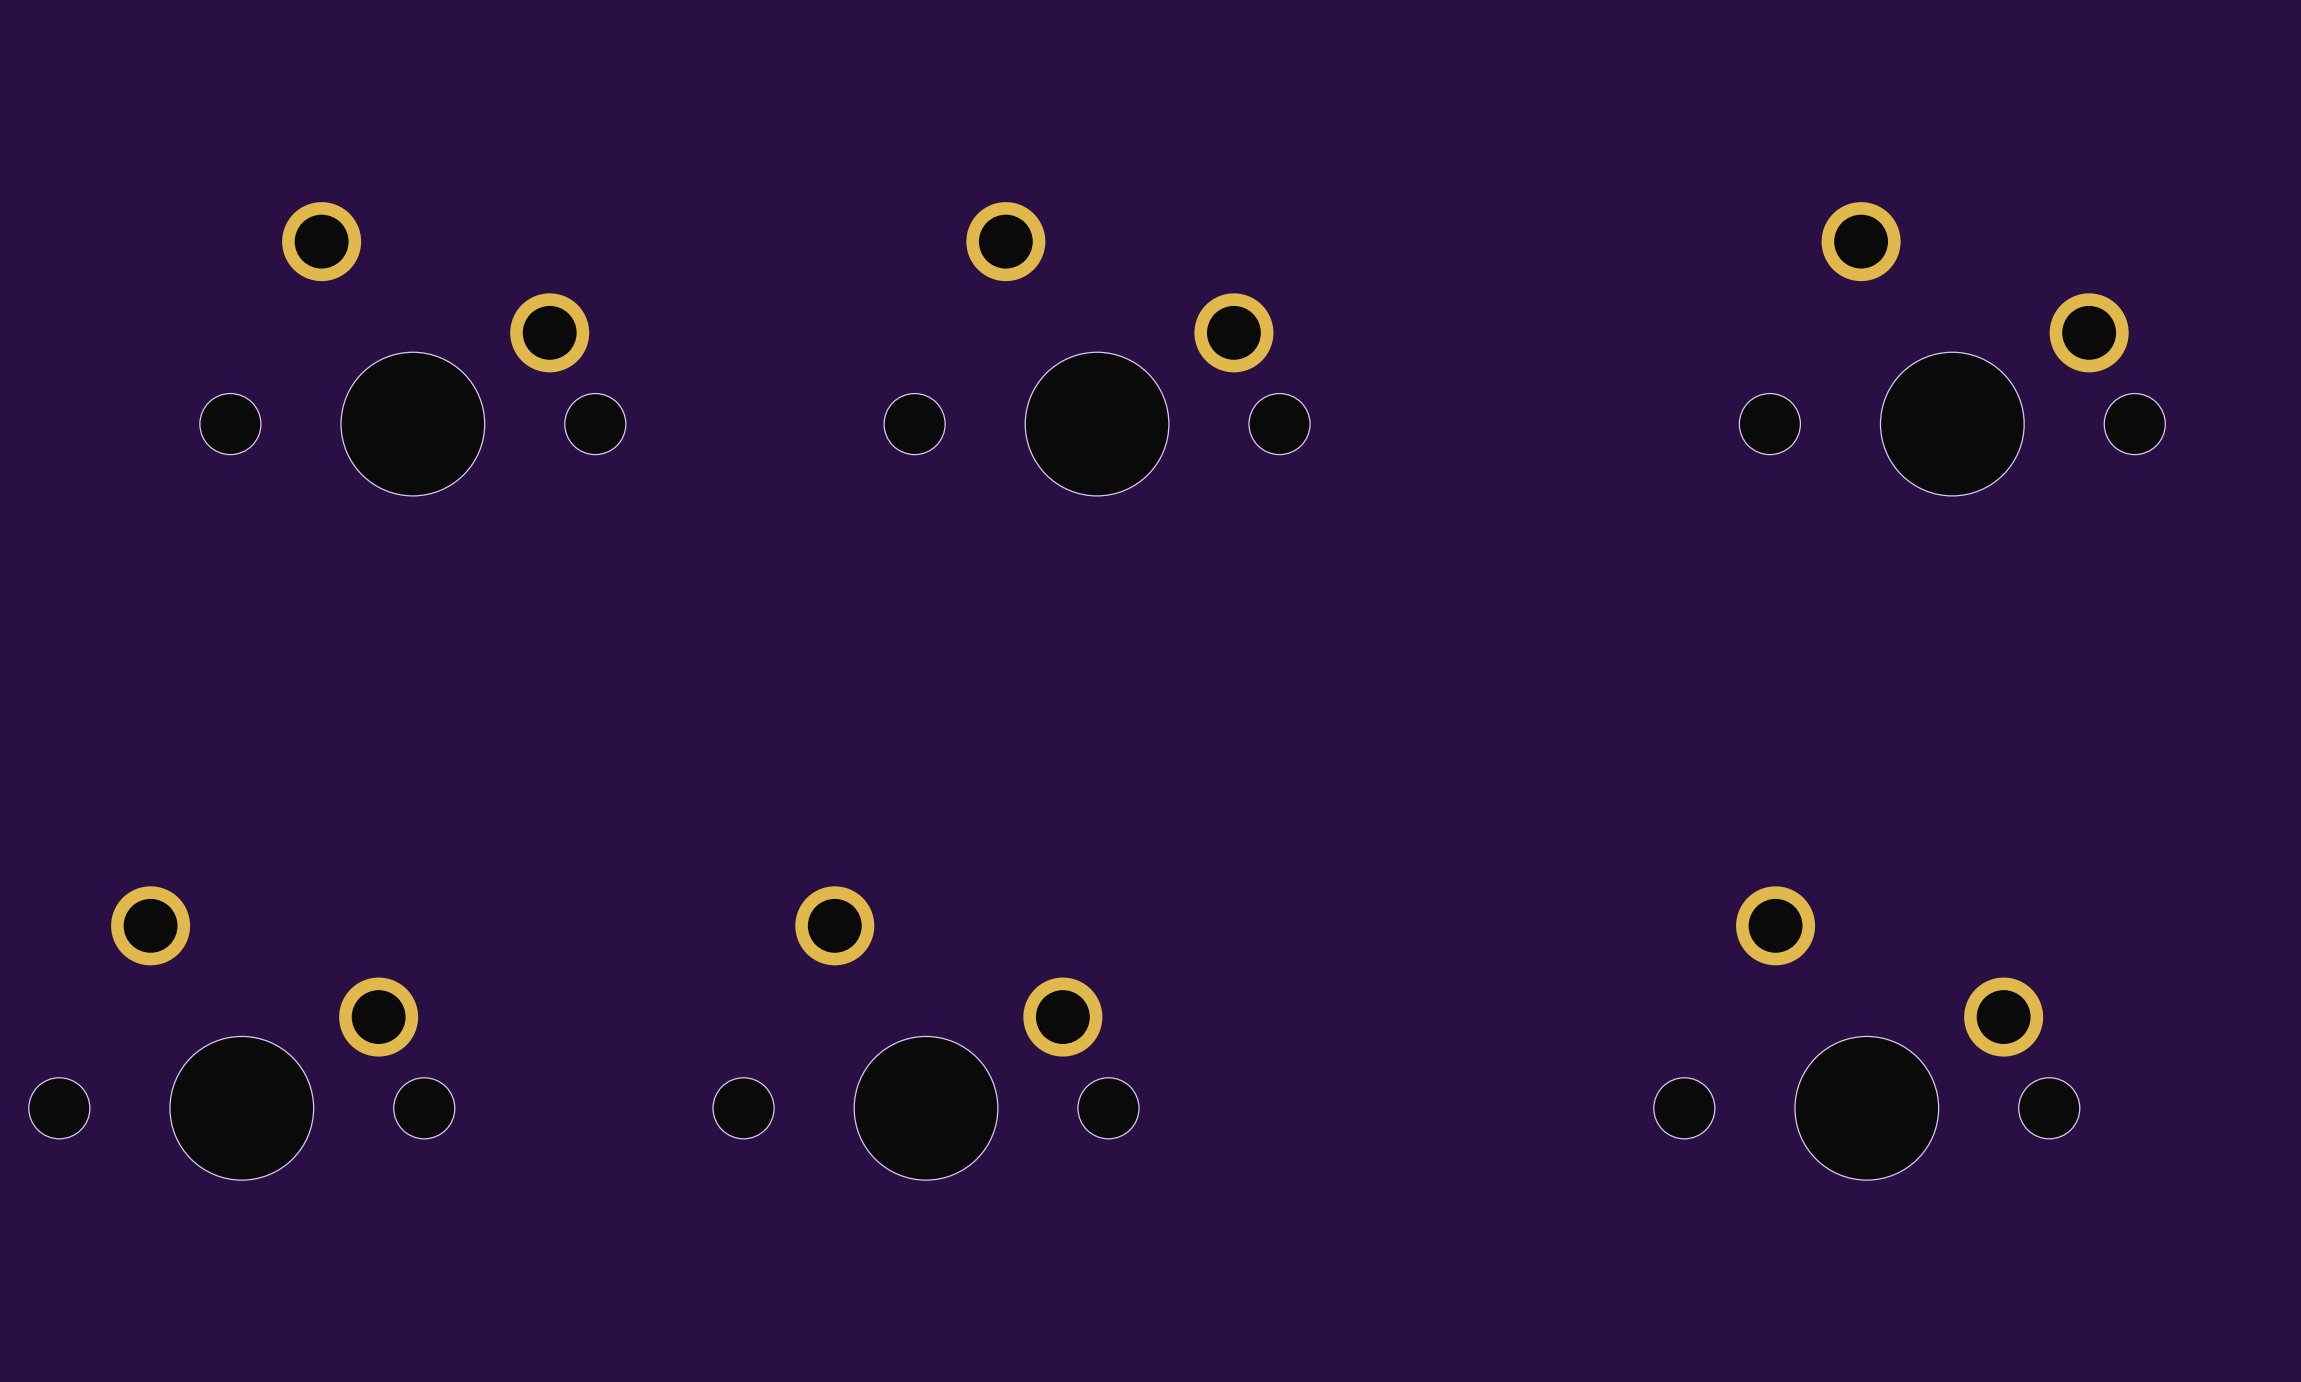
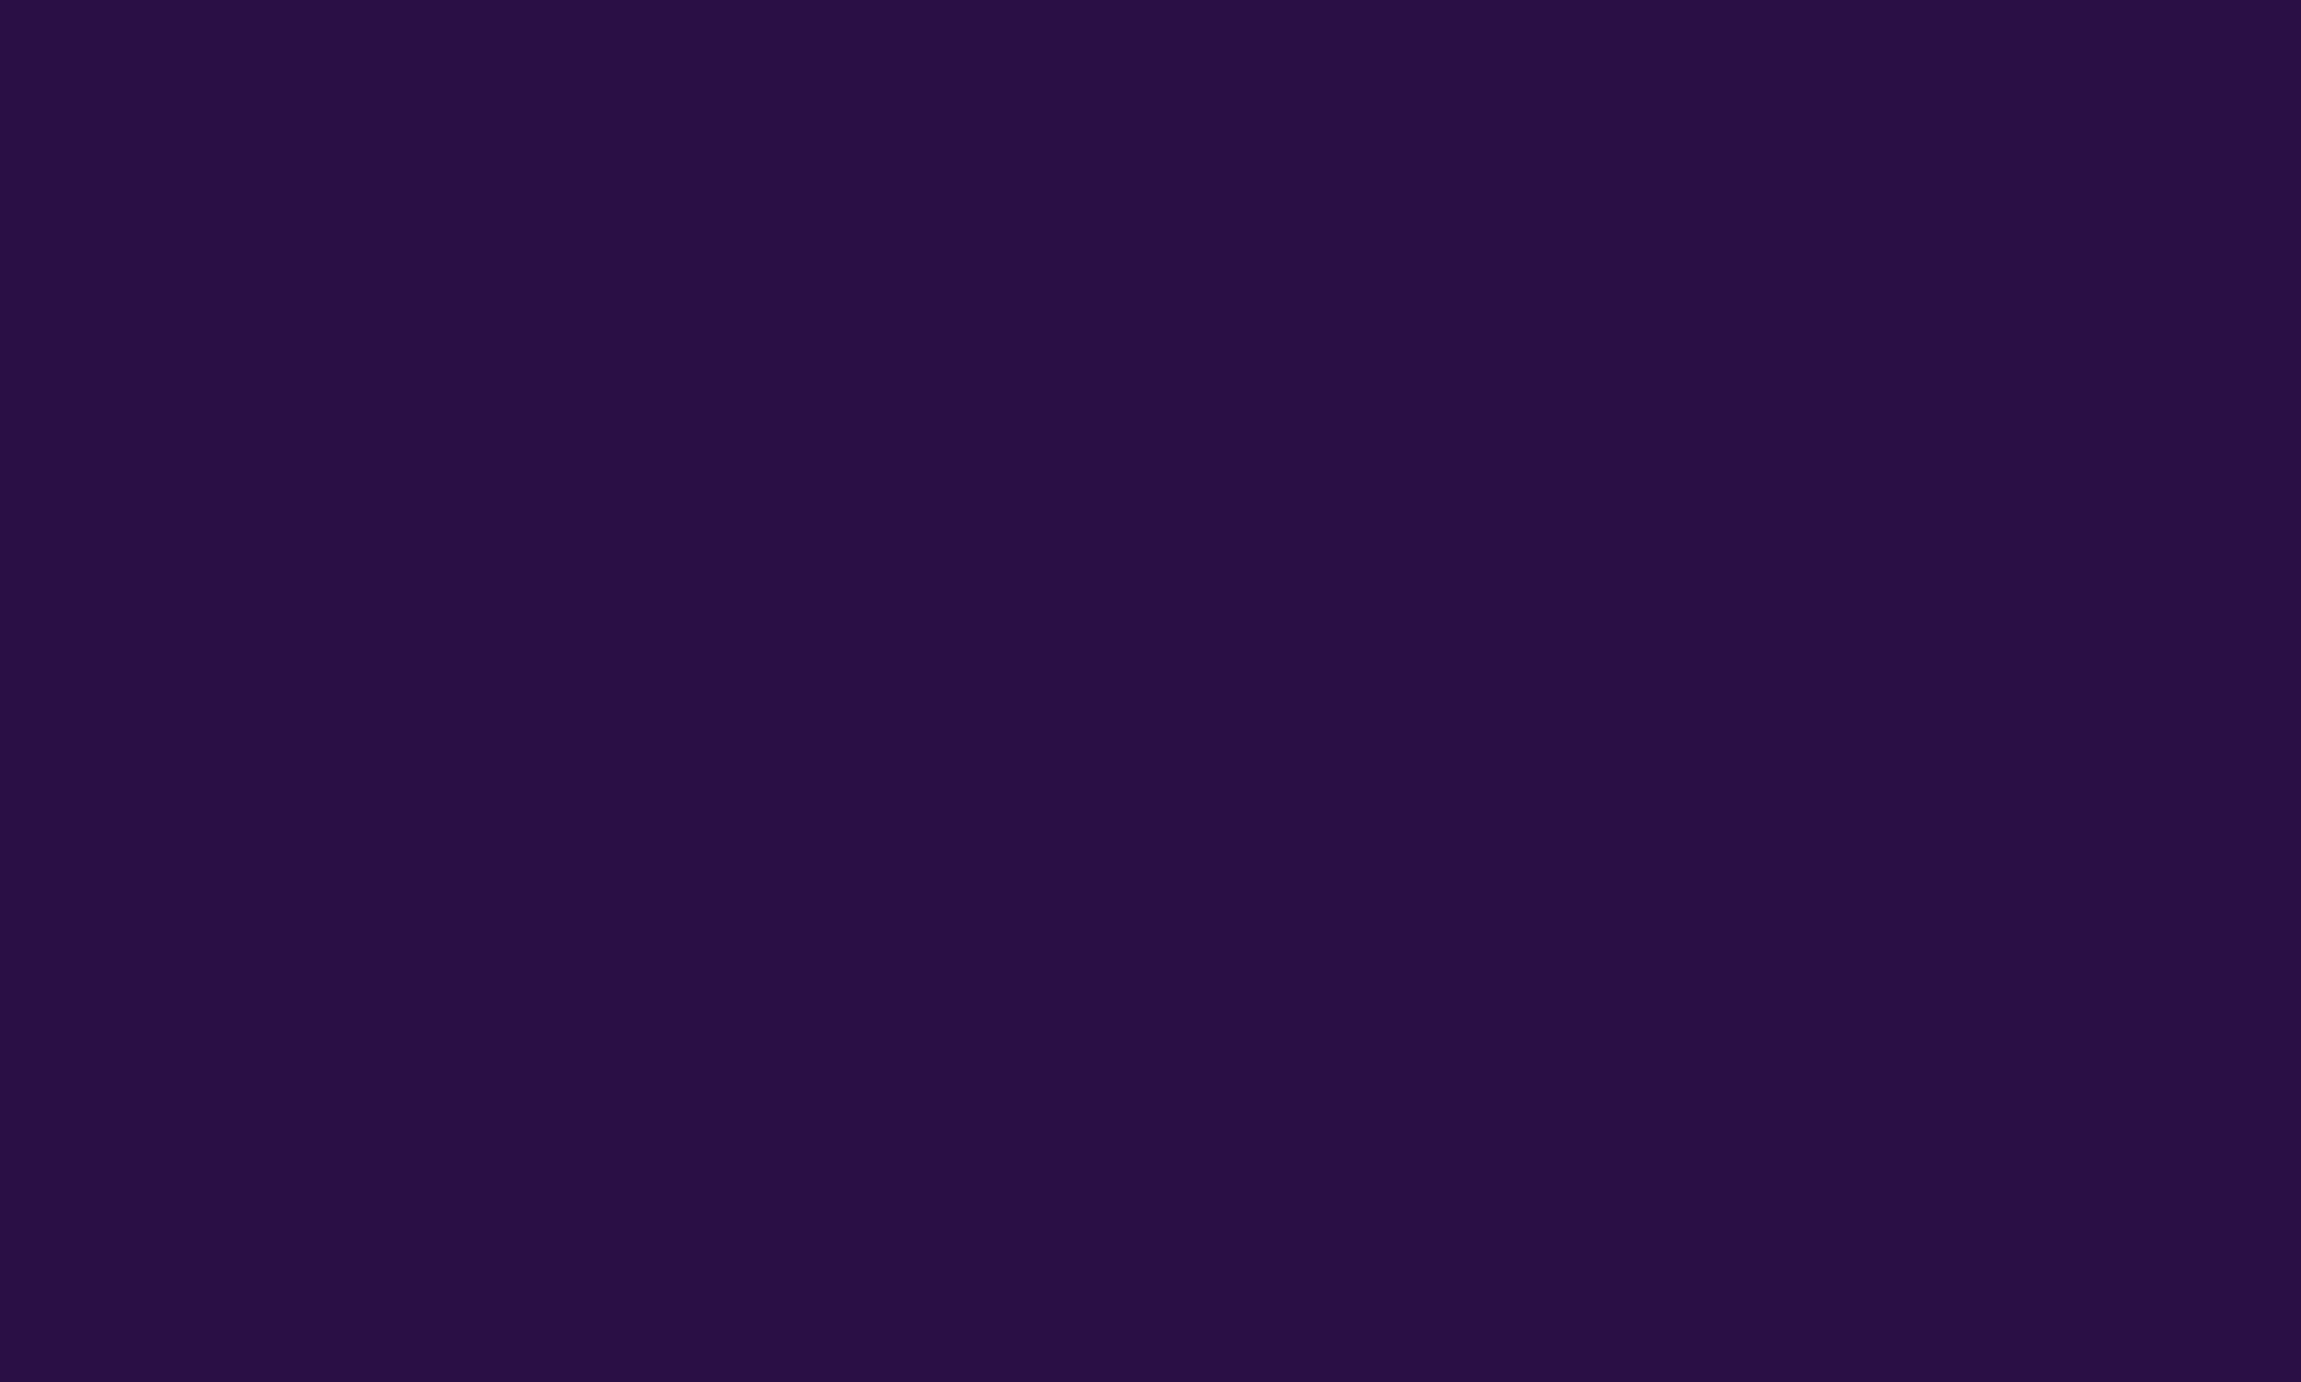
part: (412, 349) -> none
part: (1097, 349) -> none
part: (1952, 349) -> none
part: (241, 1033) -> none
part: (926, 1033) -> none
part: (1866, 1033) -> none

